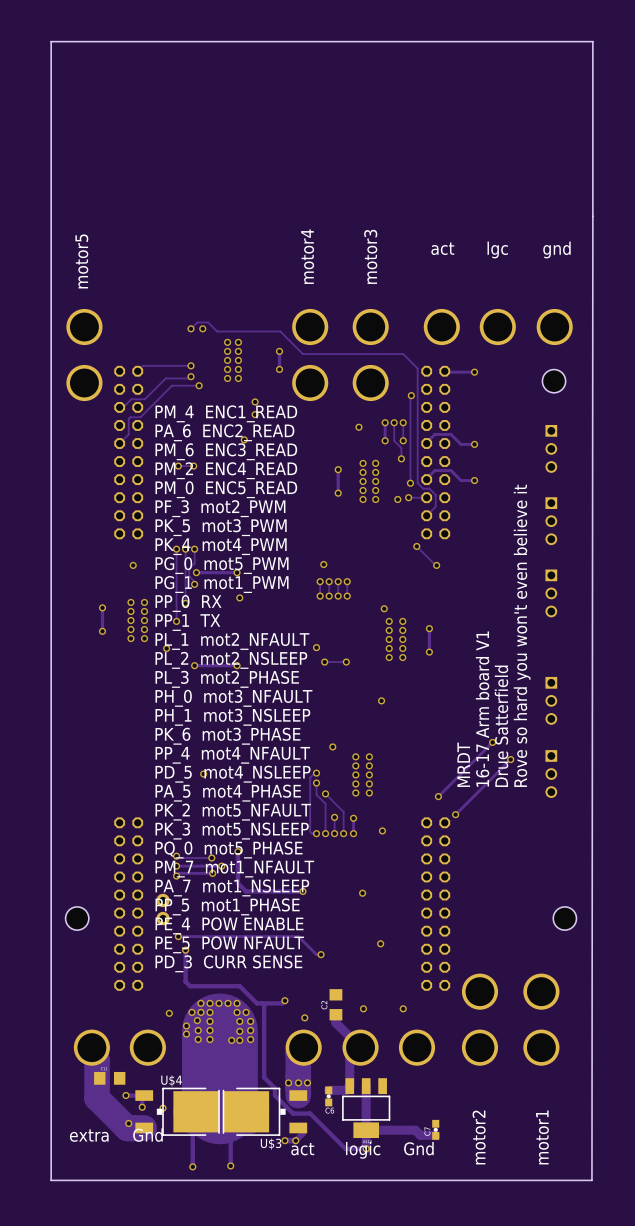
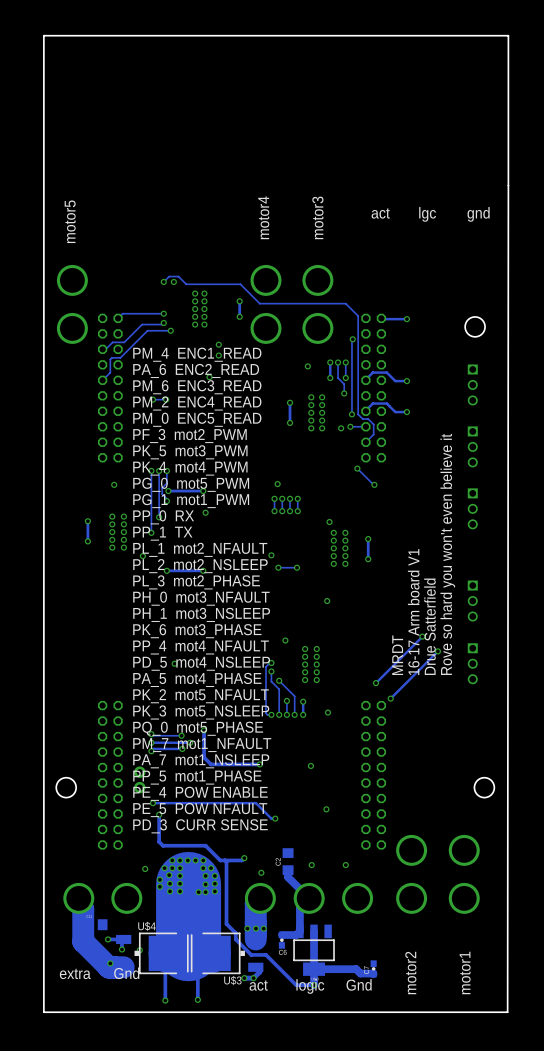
part: (441, 327) -> none
part: (497, 327) -> none
part: (554, 327) -> none

